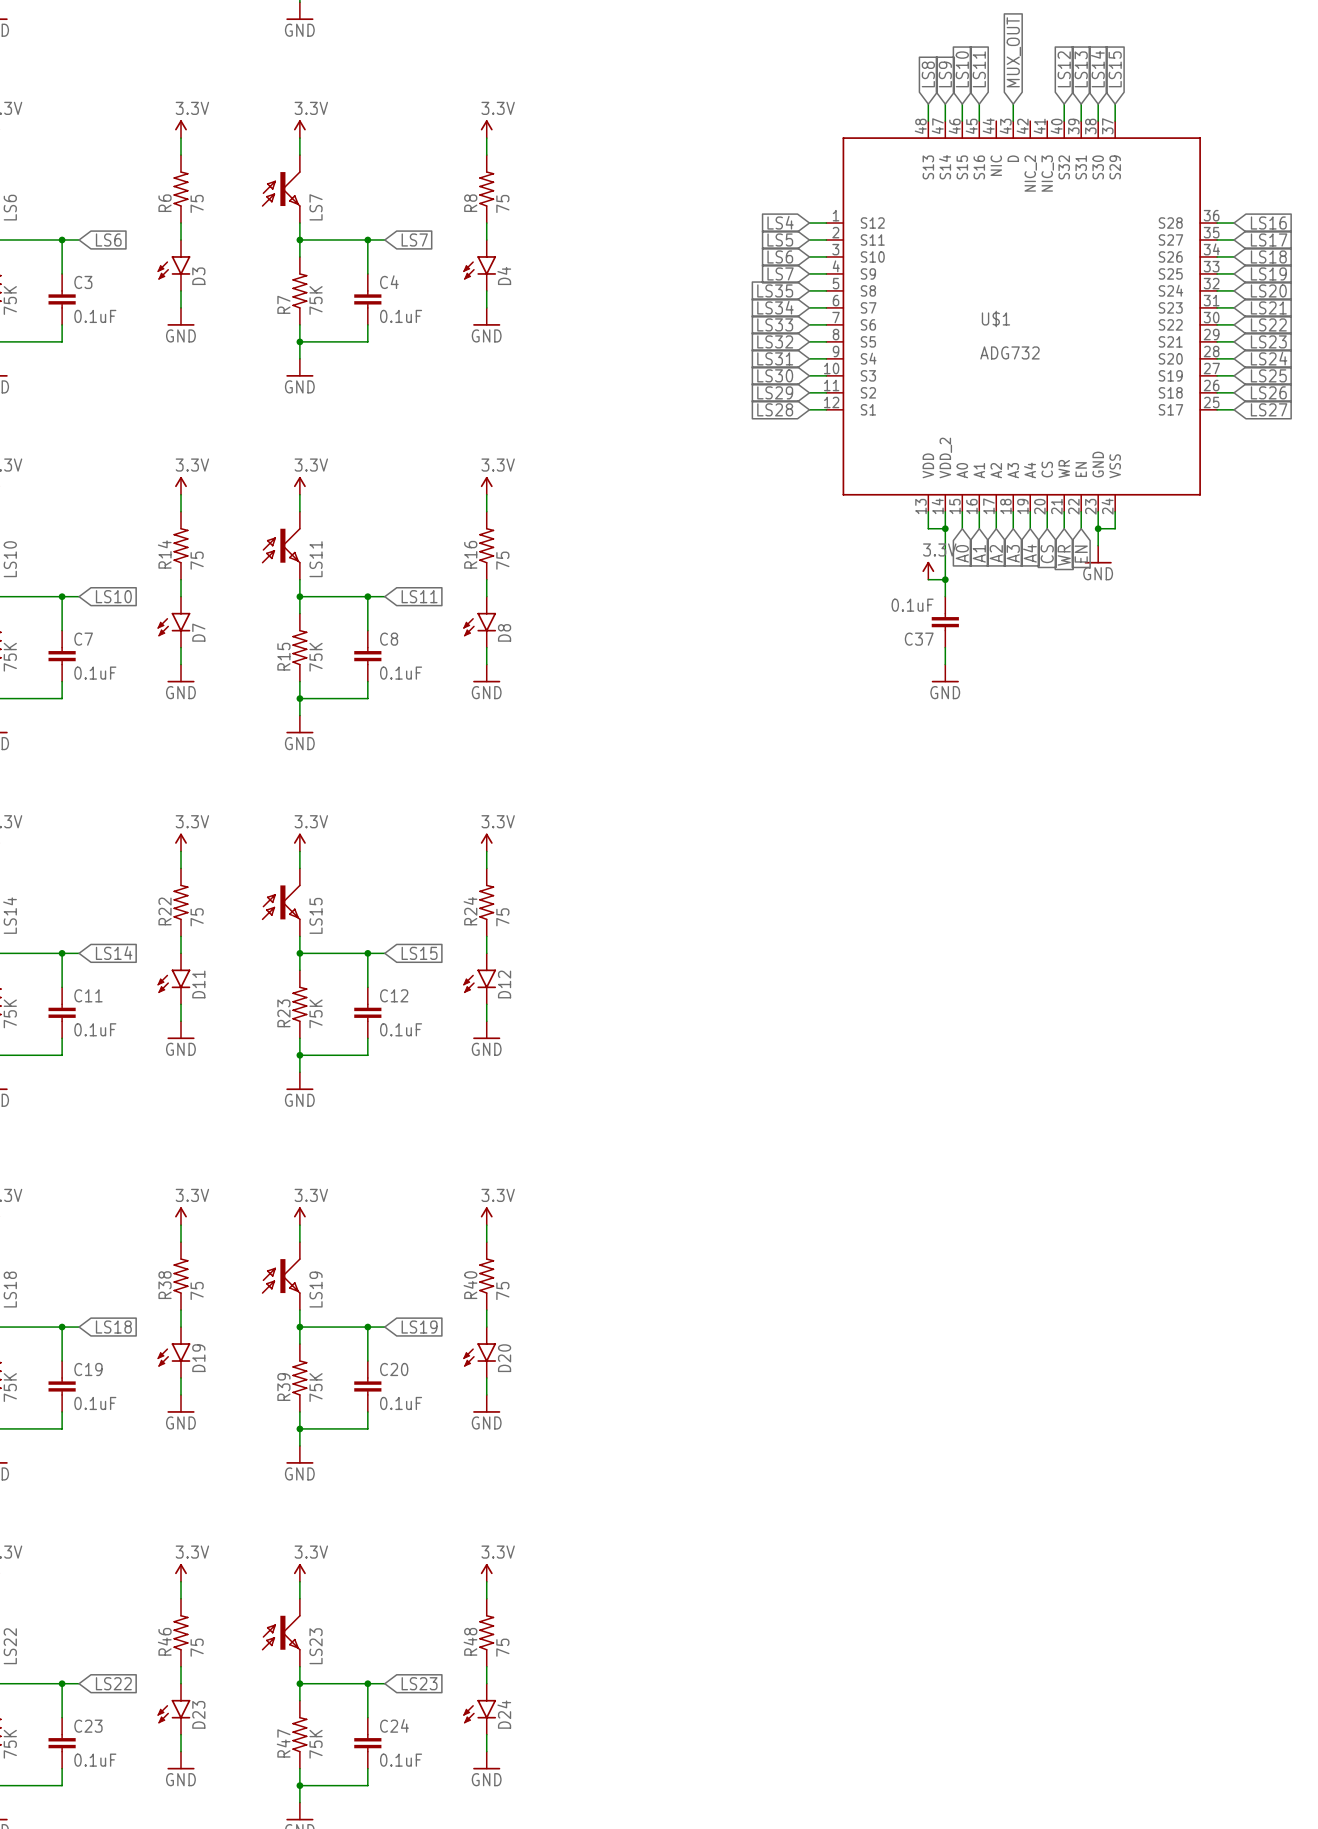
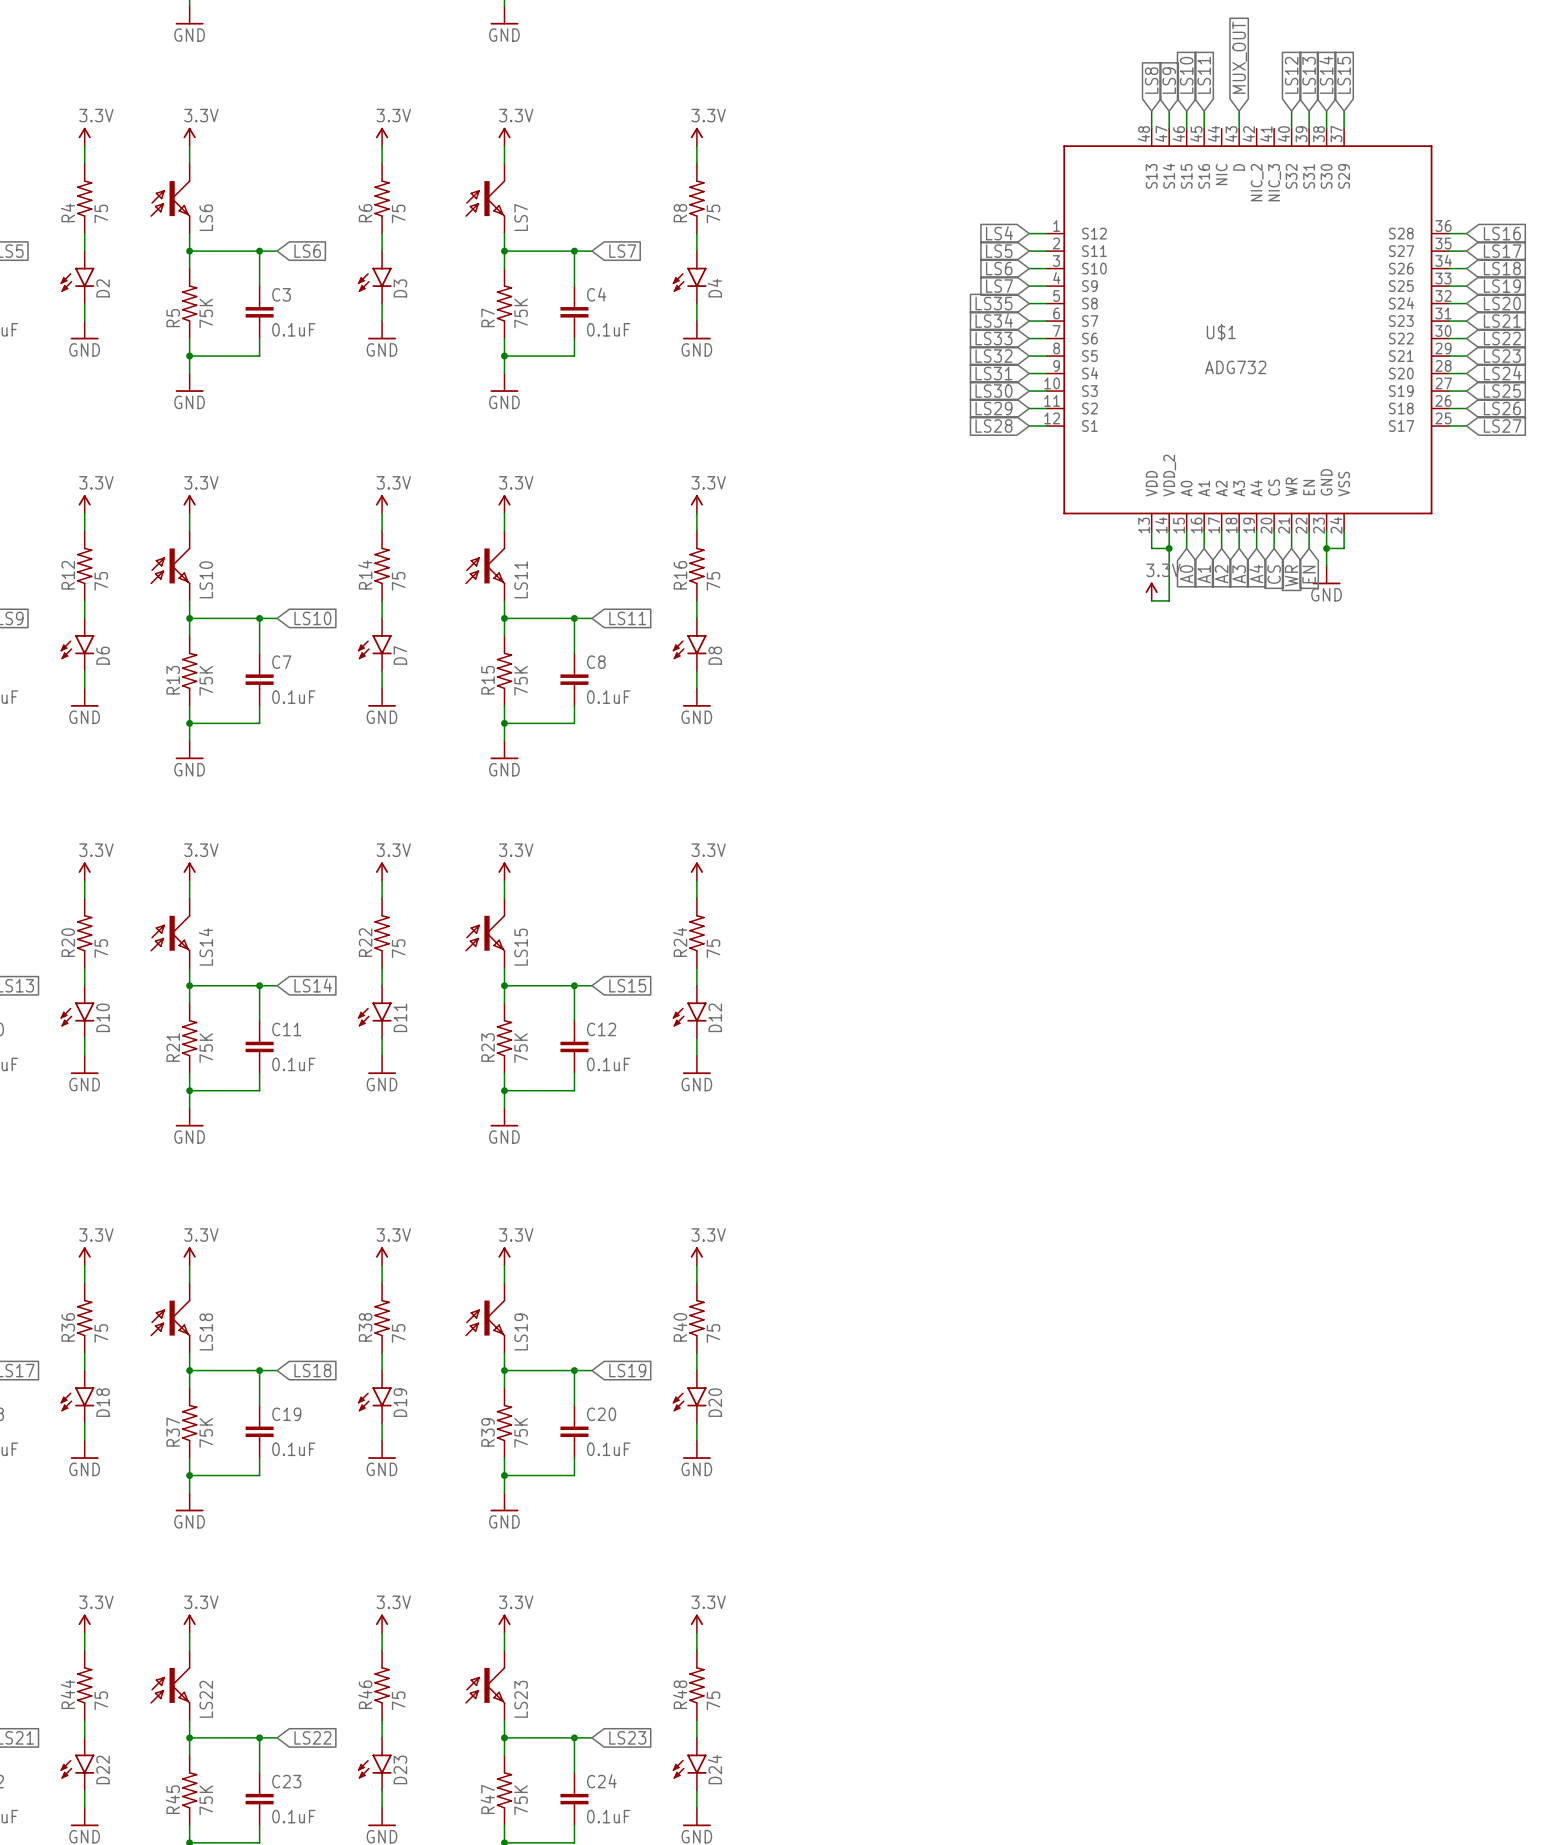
wire: (945, 579) (945, 596) -> none
junction: (945, 579) -> none
C37: 0.1uF (945, 622) -> none
wire: (945, 647) (945, 664) -> none
power symbol: GND (945, 673) -> none

